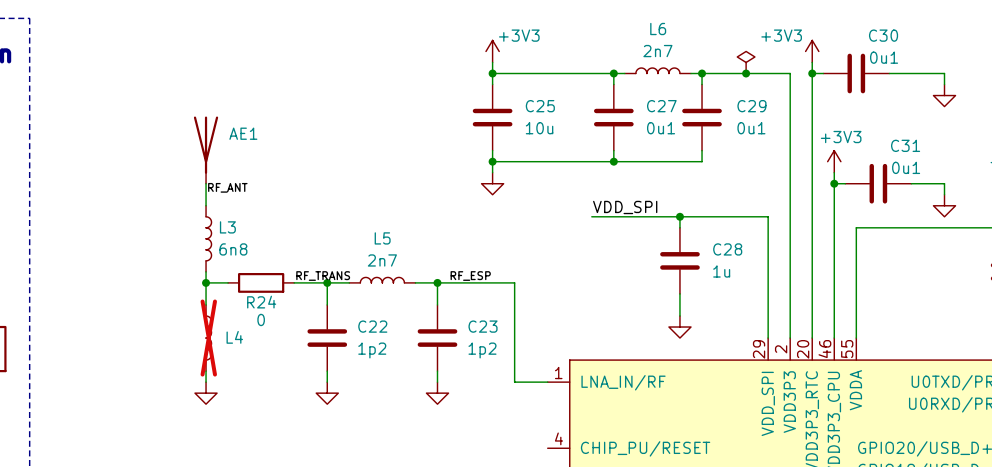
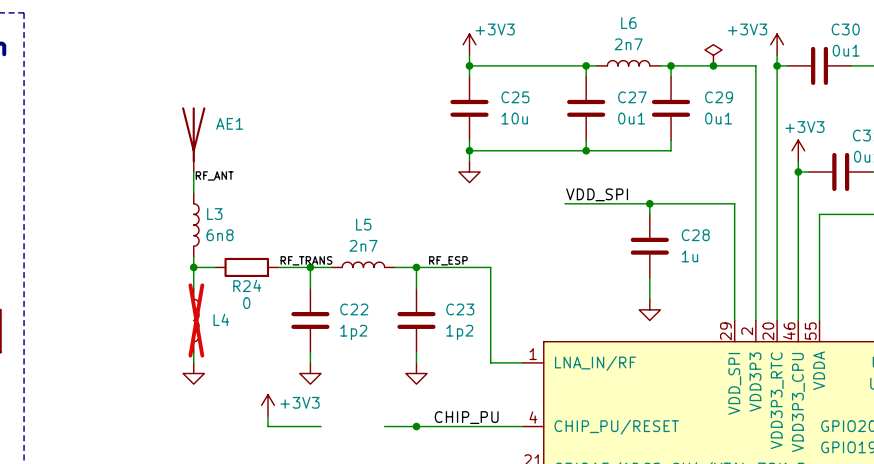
power symbol: none -> +3V3 (267, 405)
wire: none -> (267, 415) (267, 426) (321, 426)
label: none -> CHIP_PU (466, 417)
wire: none -> (384, 426) (522, 426)
junction: none -> (416, 426)

